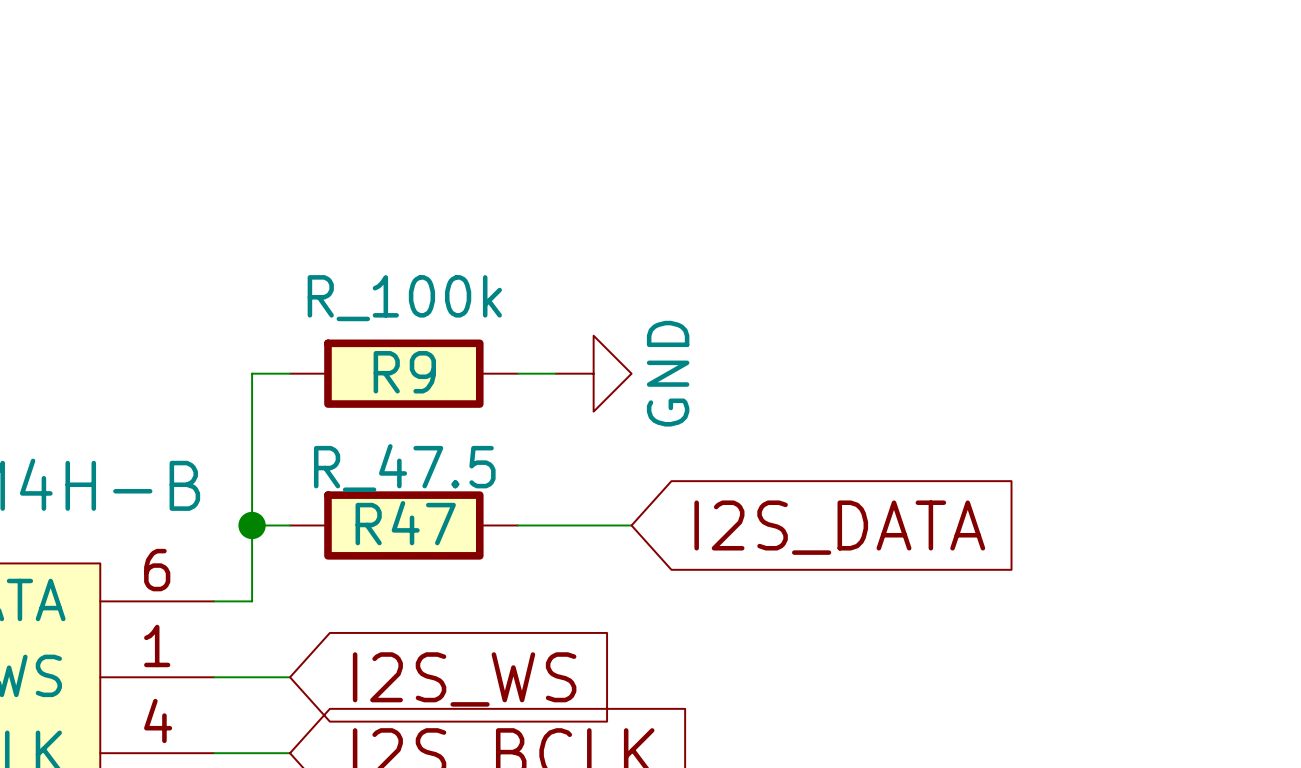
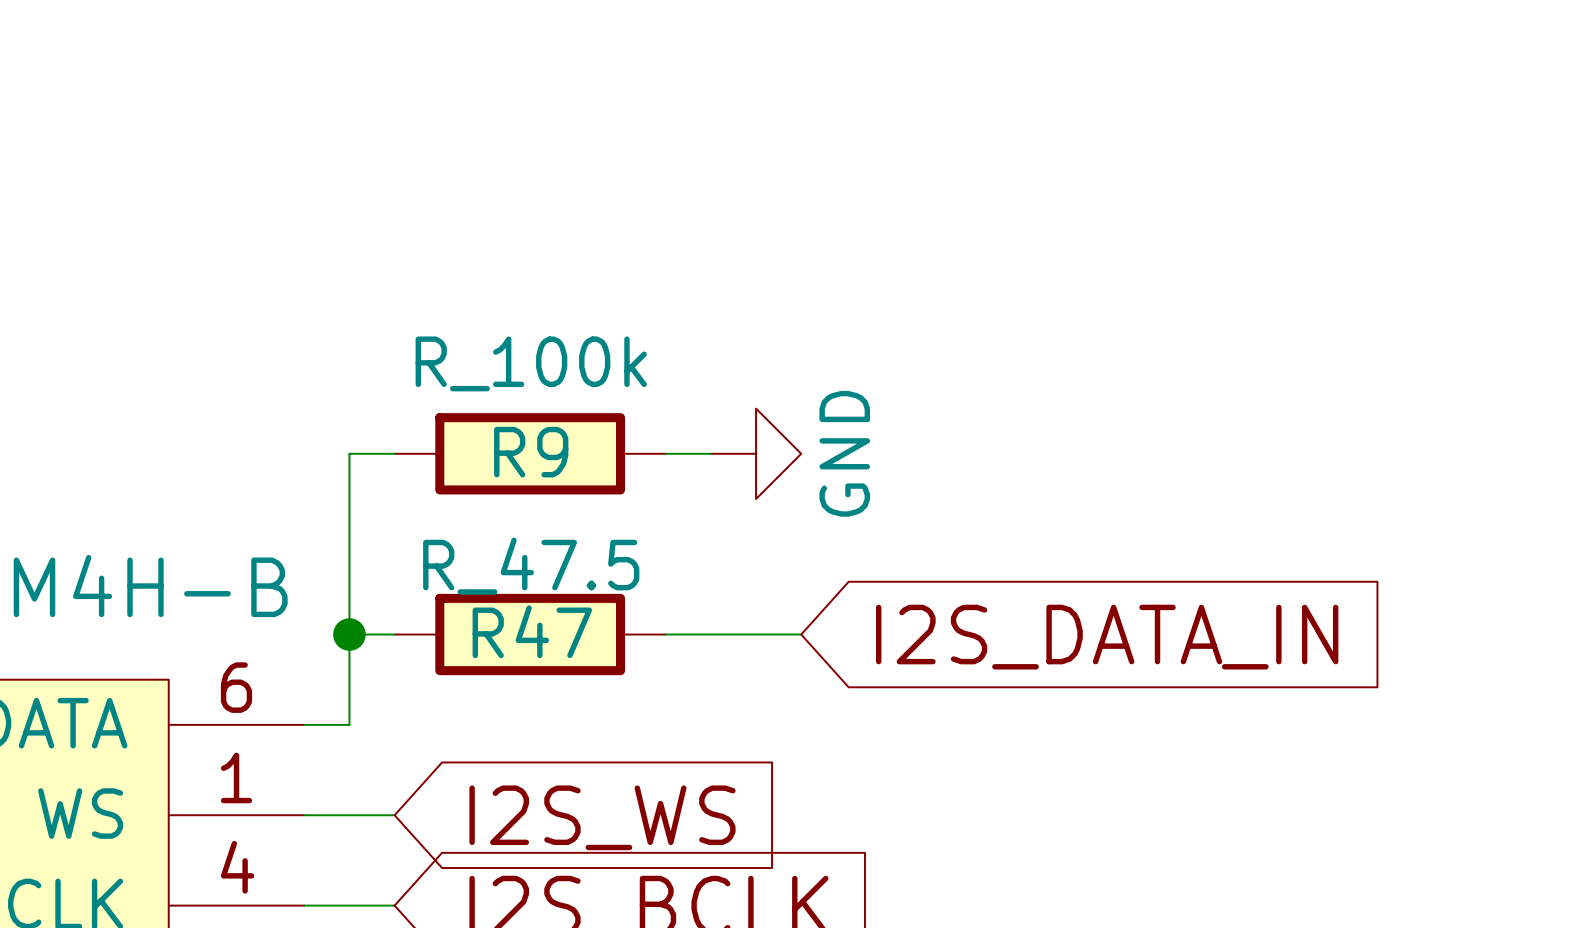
global label: I2S_DATA (839, 527) -> I2S_DATA_IN (1107, 637)

